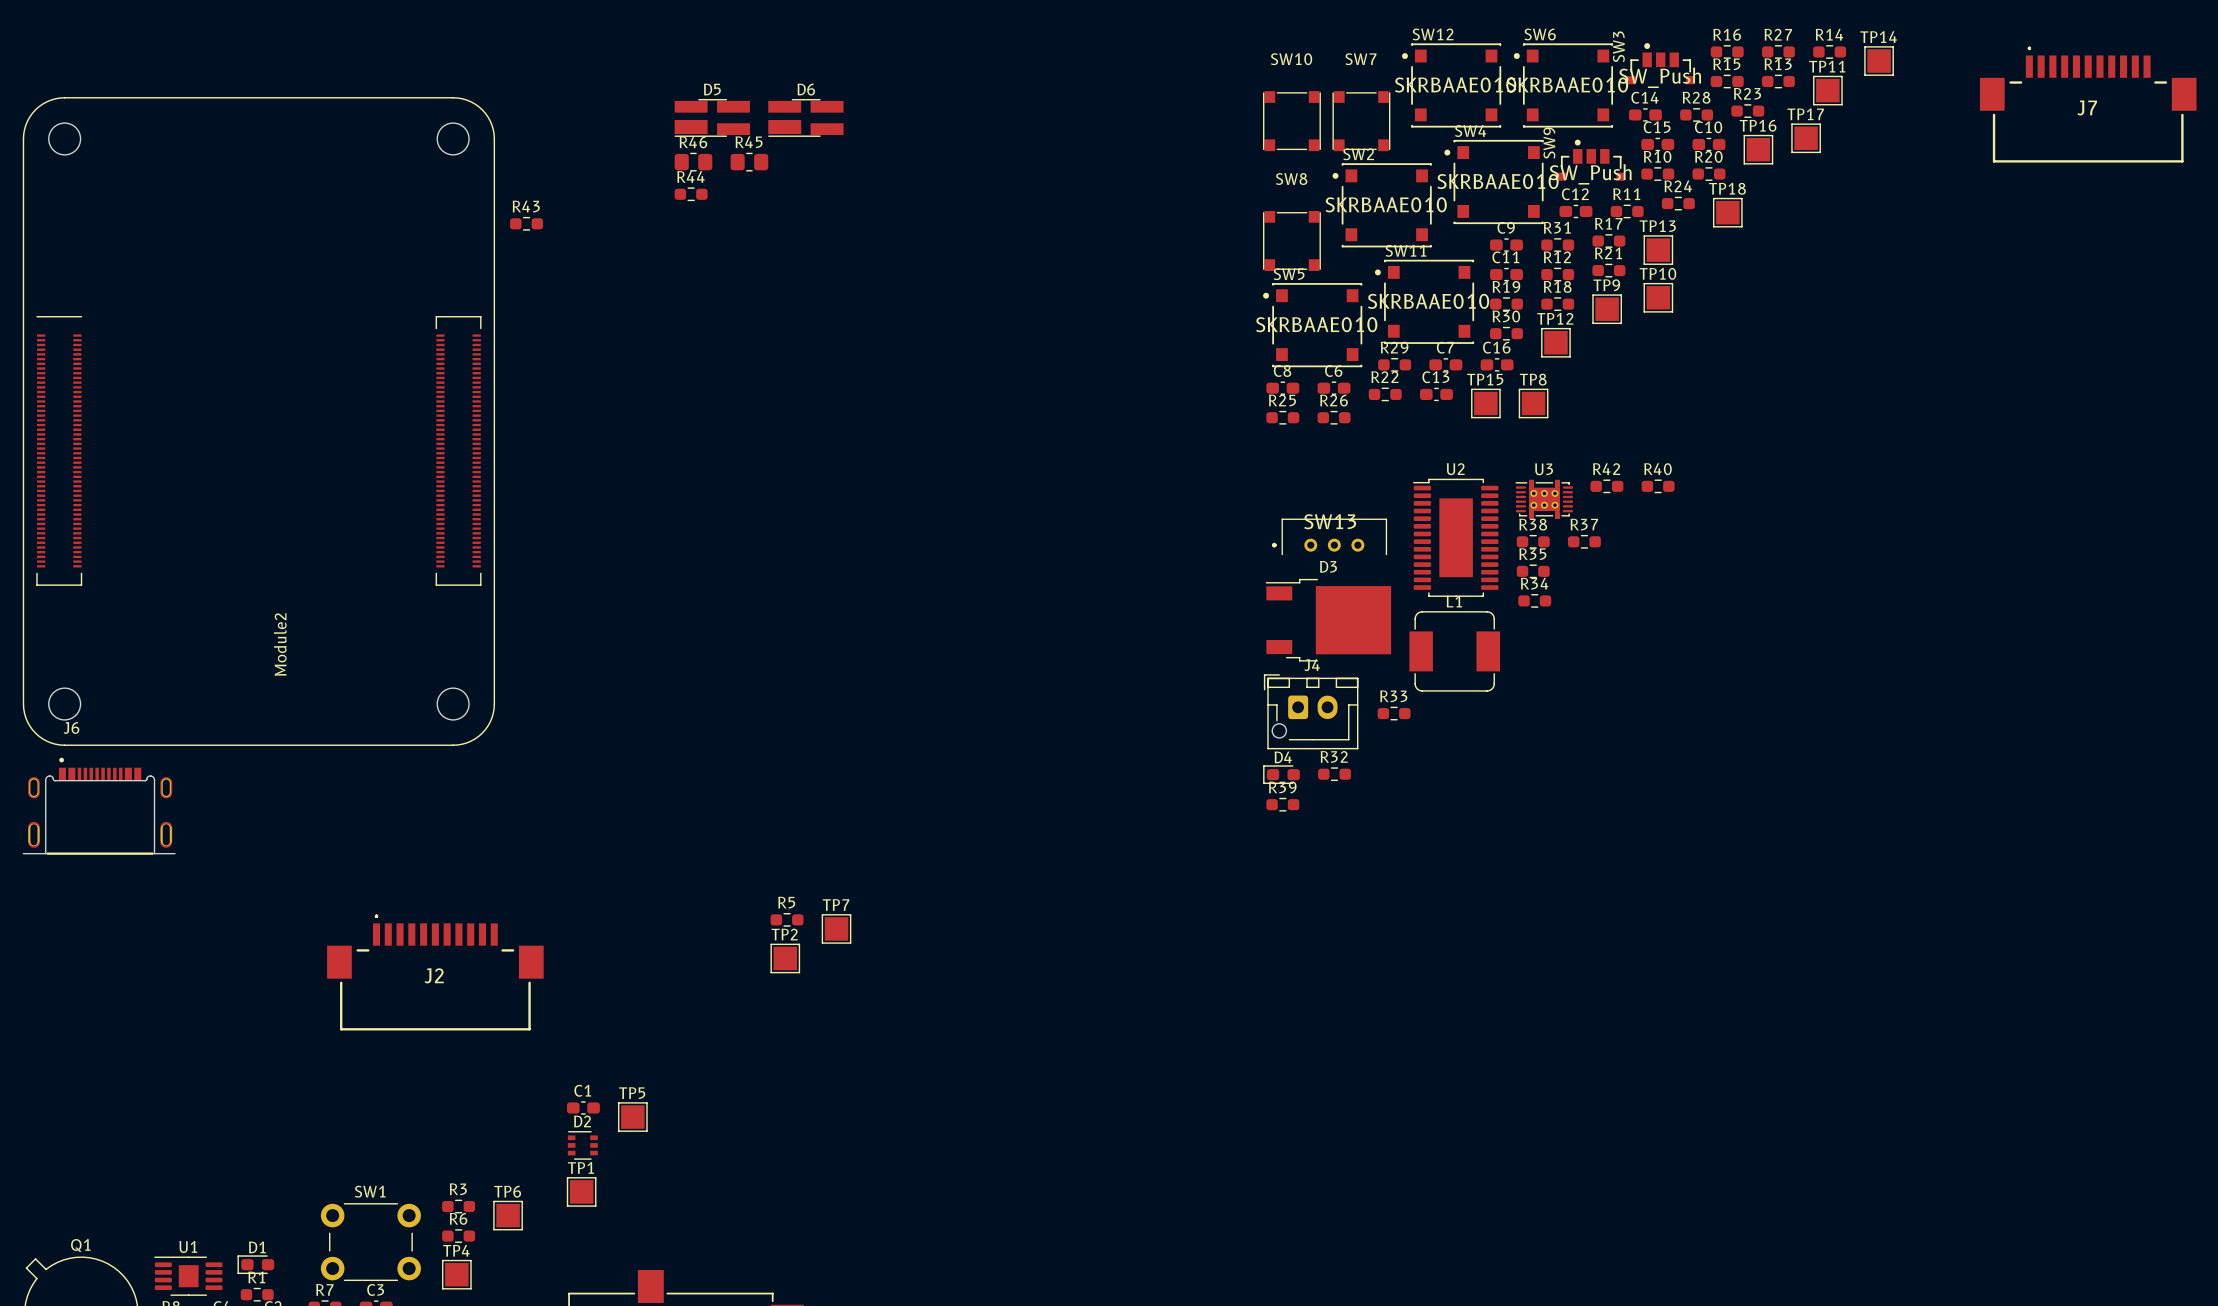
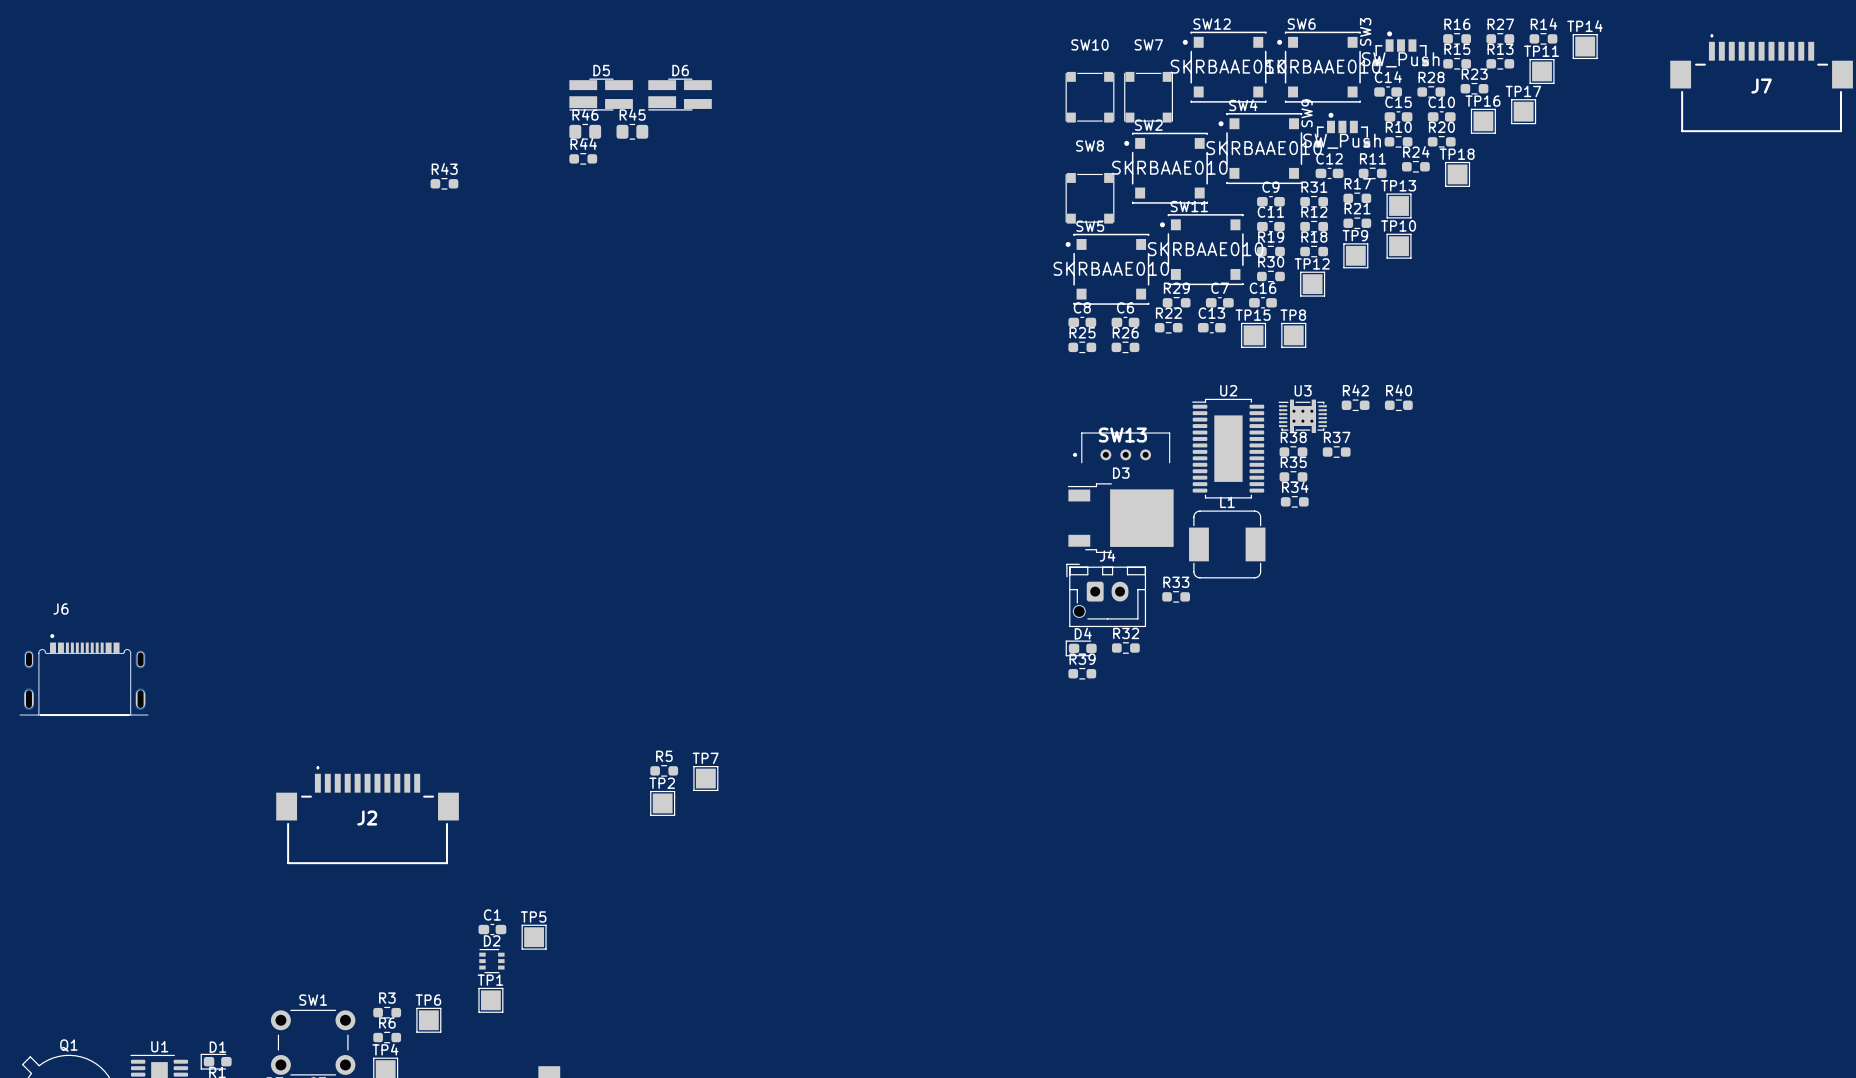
Module2: (258, 421) -> none

